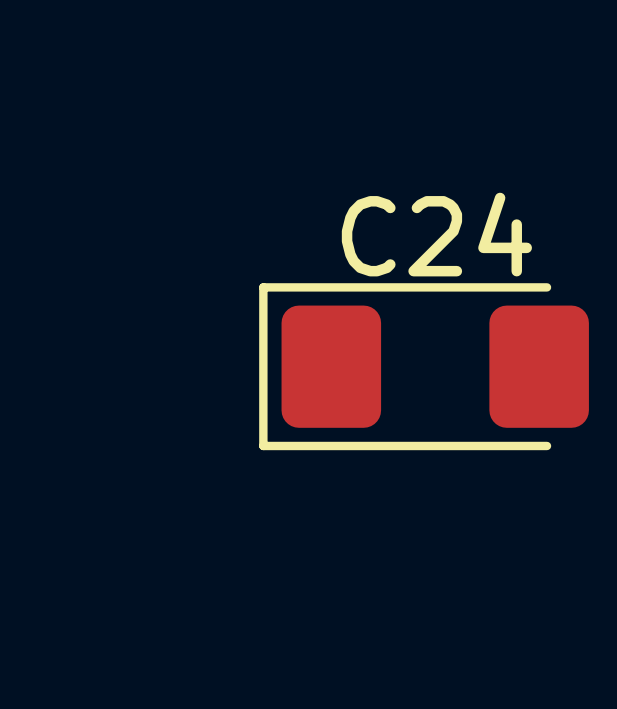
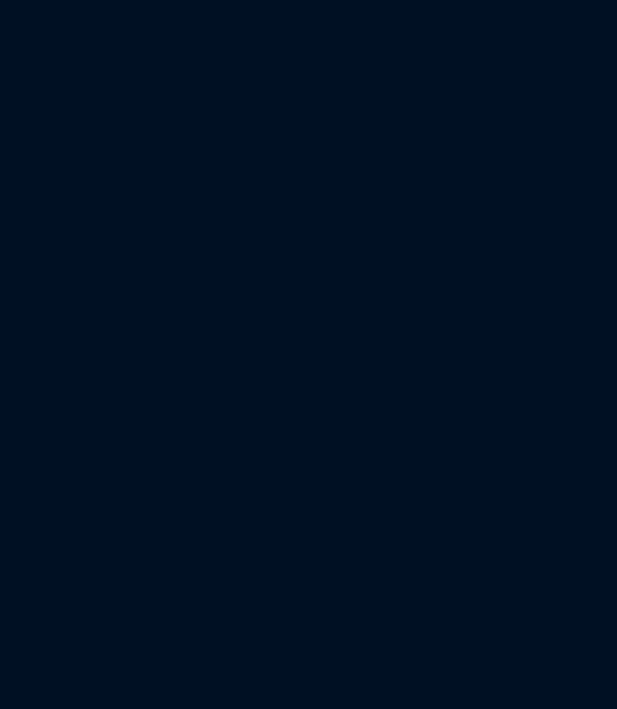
C24: (424, 366) -> none

